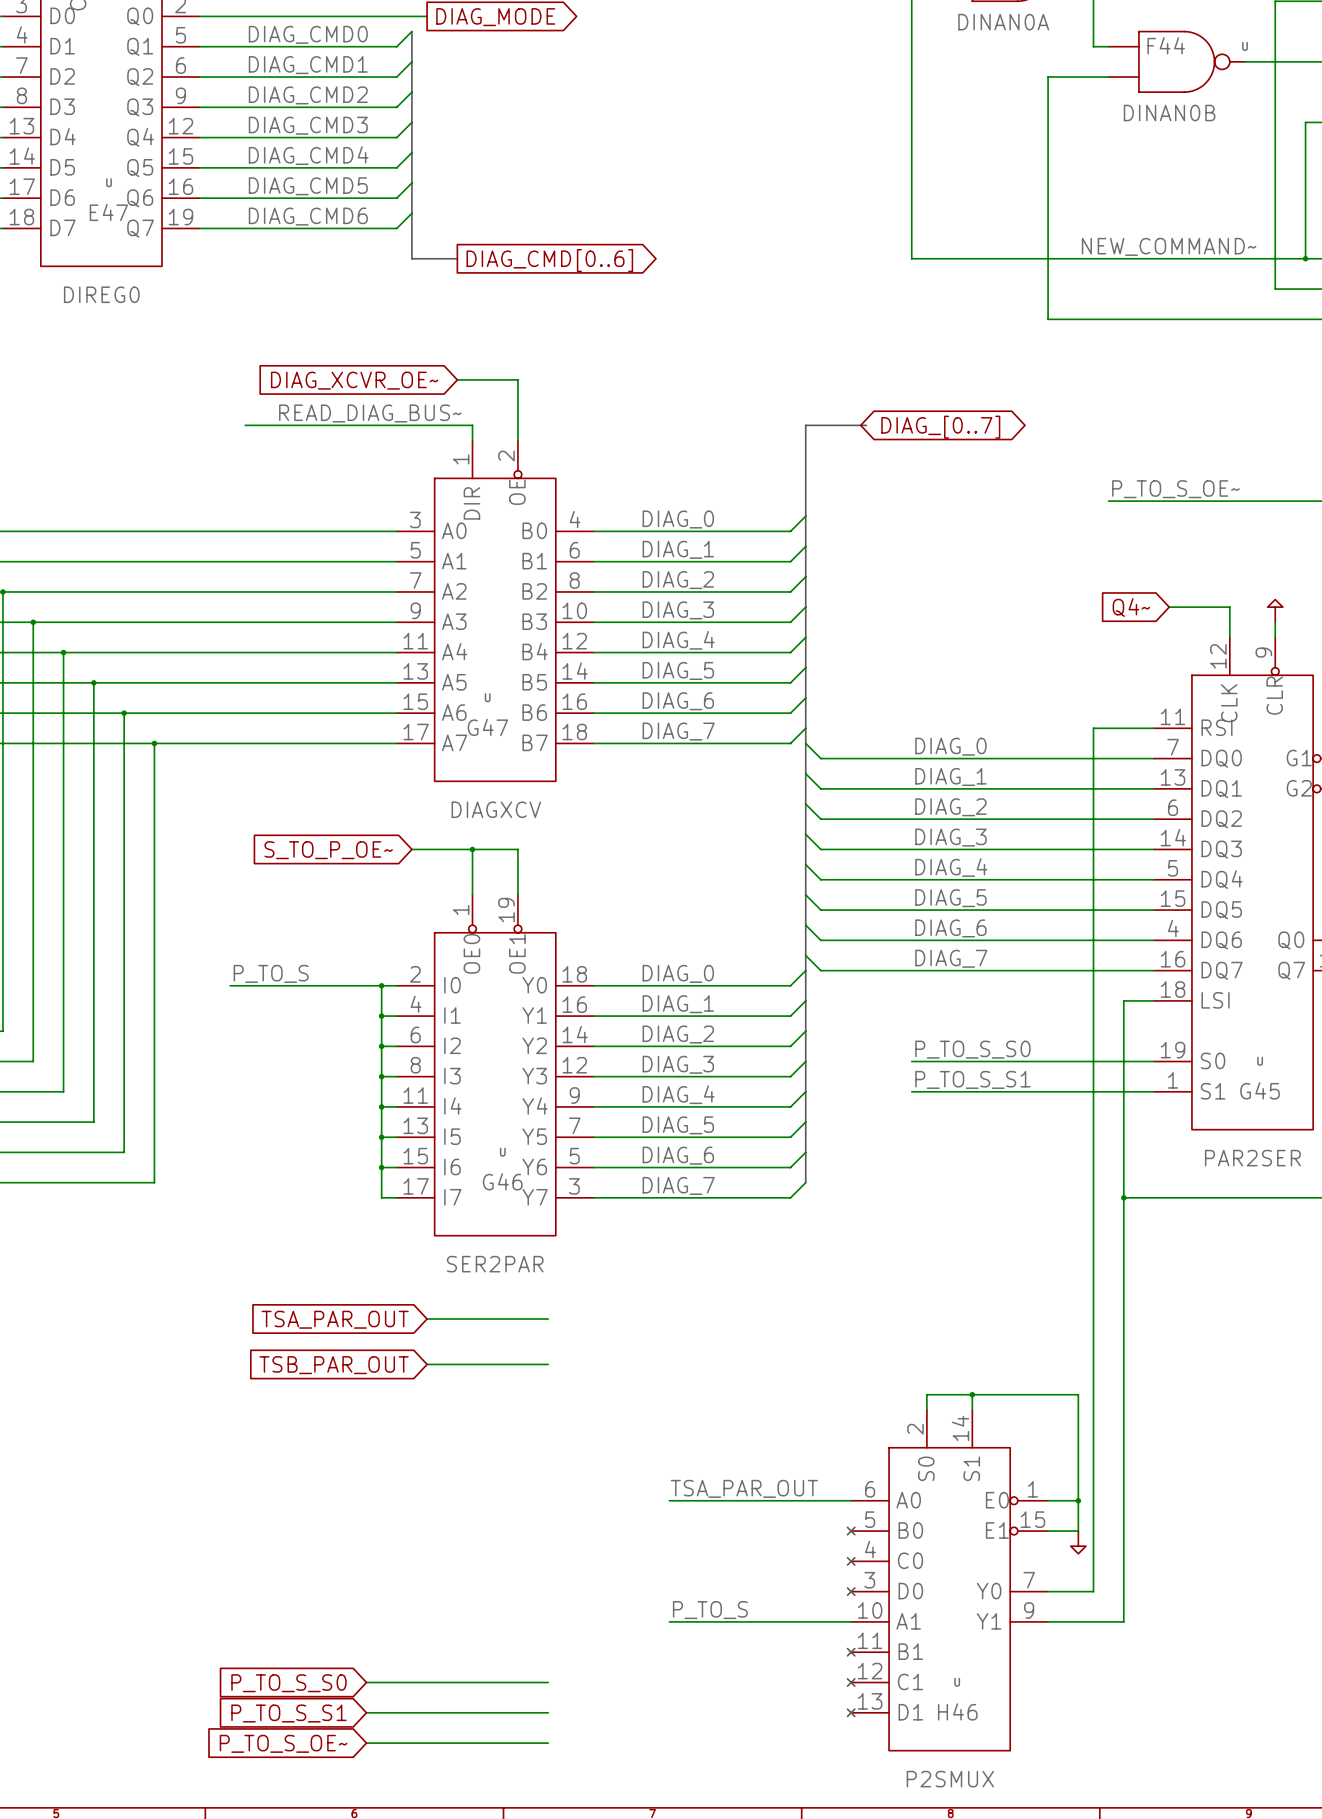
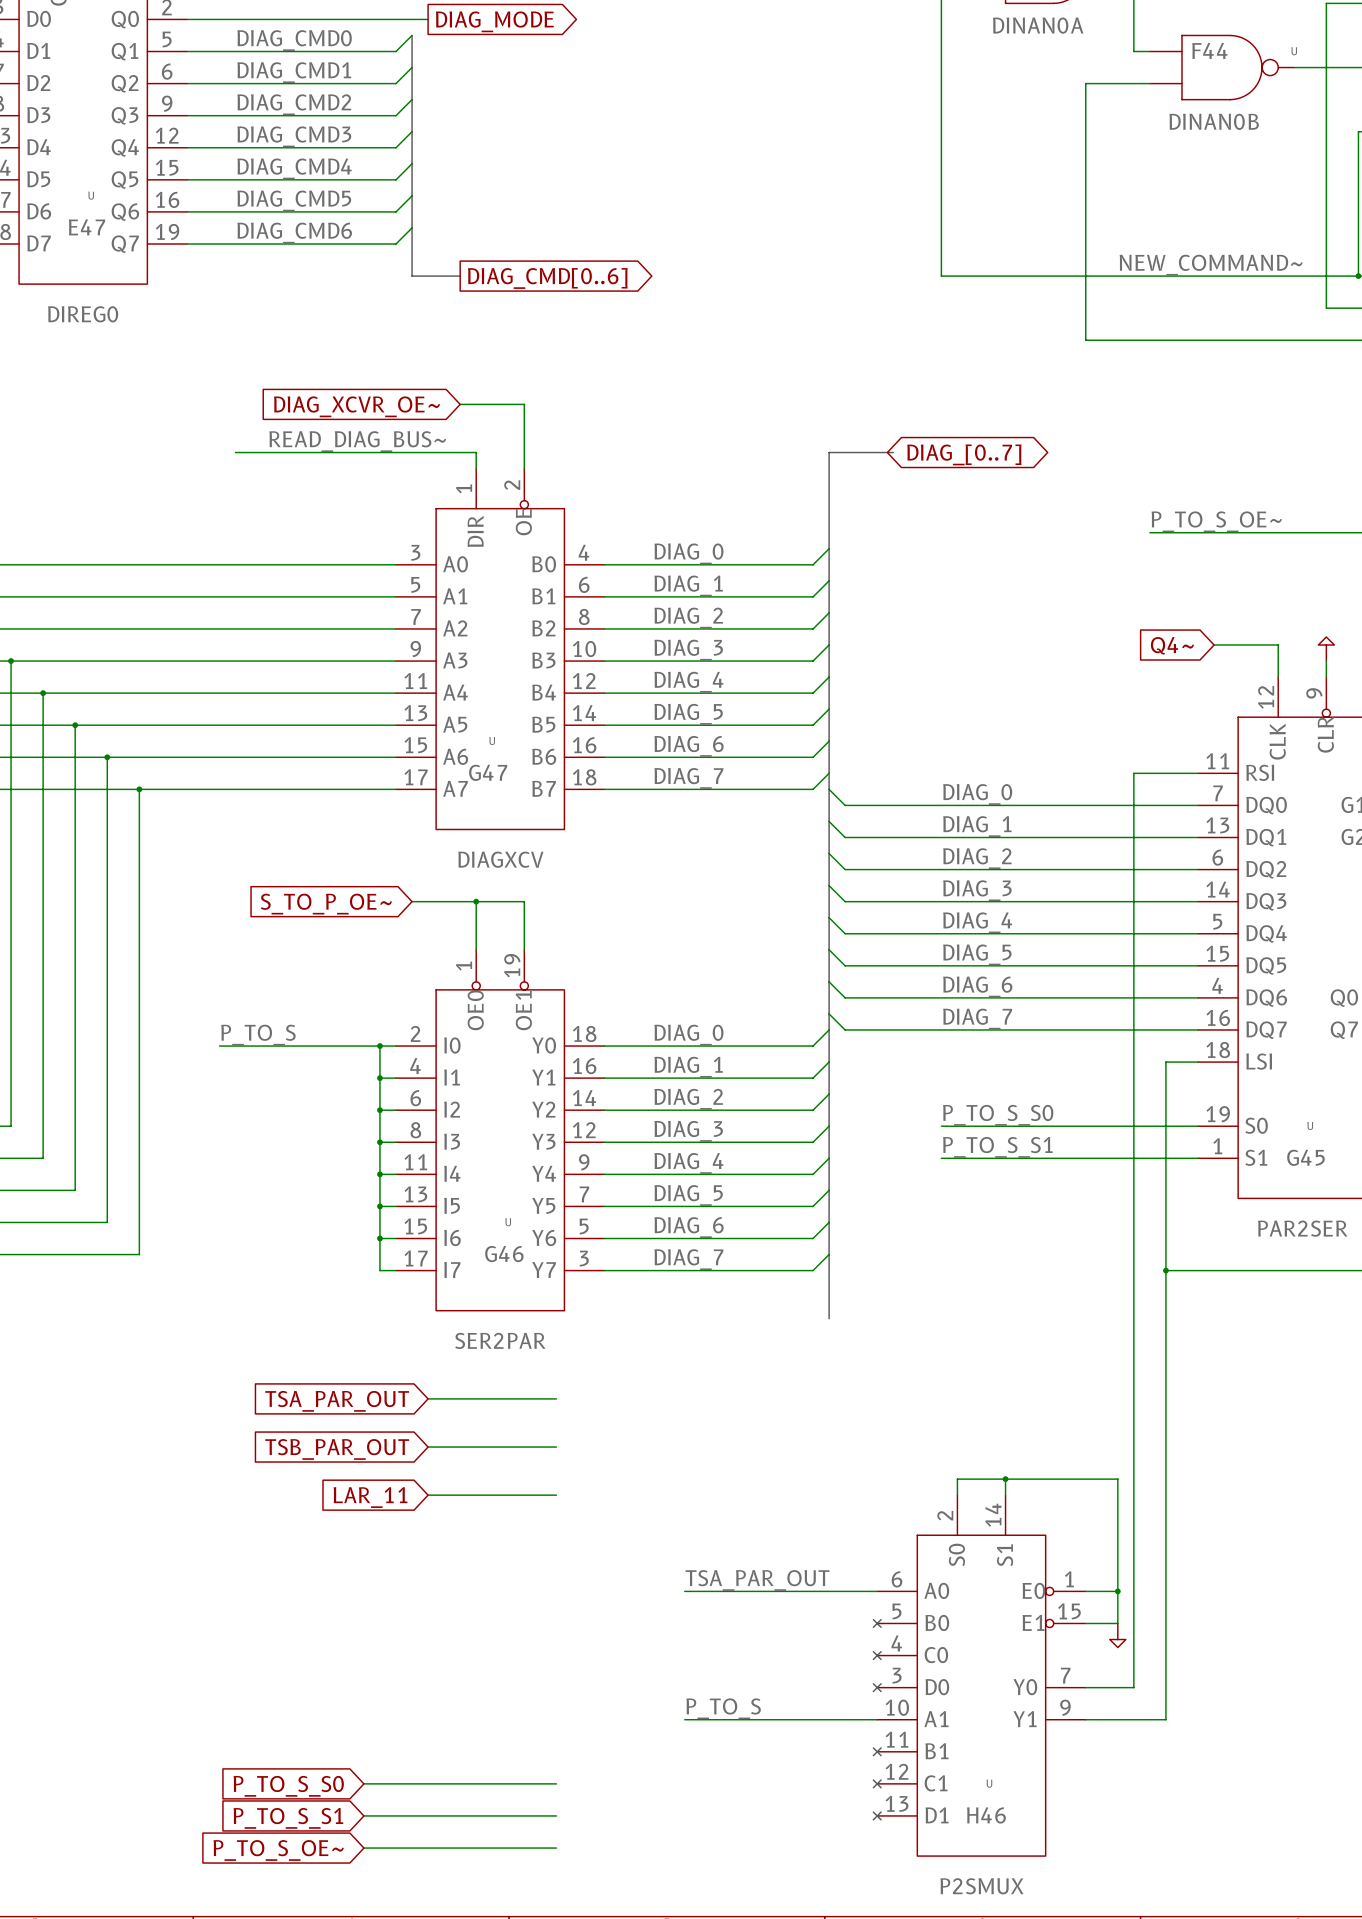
bus: none -> (829, 1254) (829, 1318)
wire: none -> (428, 1495) (556, 1495)
global label: none -> LAR_11 (370, 1497)

